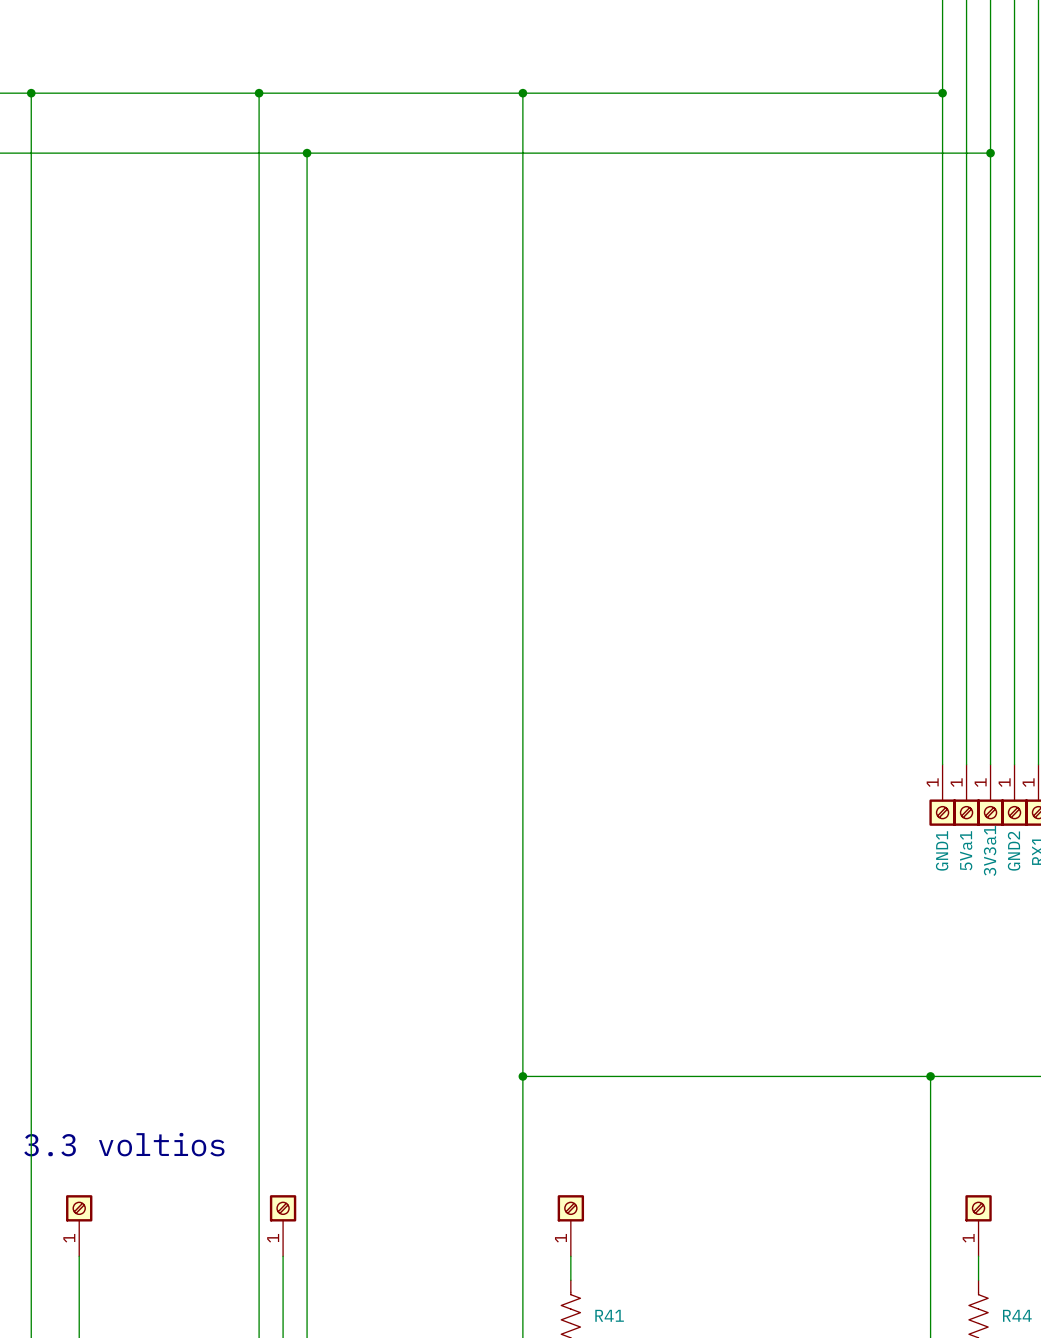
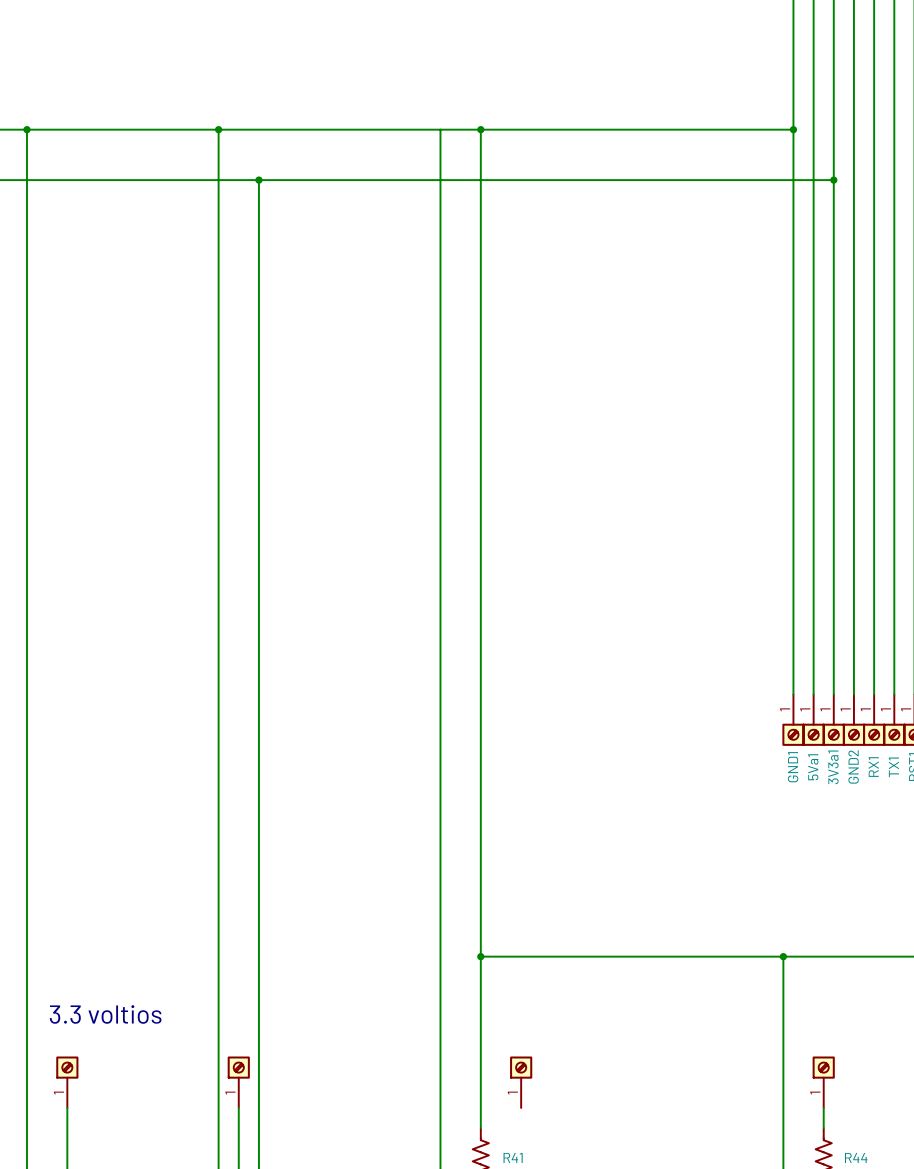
junction position: (522, 93) -> (480, 129)
wire: none -> (480, 129) (480, 1107)
wire: (522, 1076) (570, 1076) -> none
junction position: (522, 1076) -> (480, 956)
part position: (570, 1225) -> (521, 1082)

